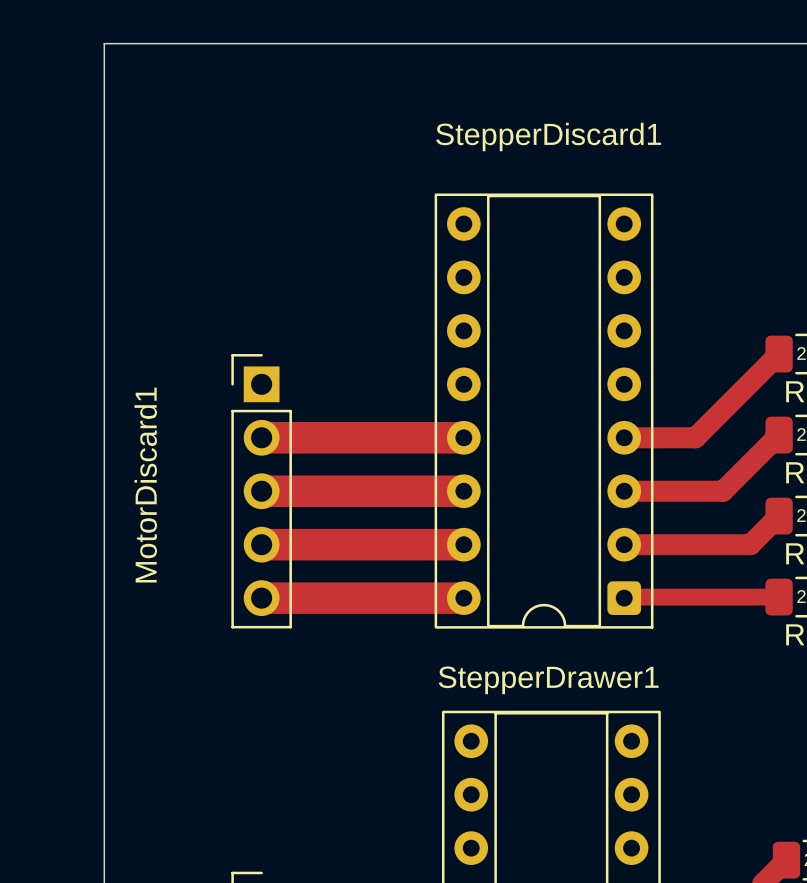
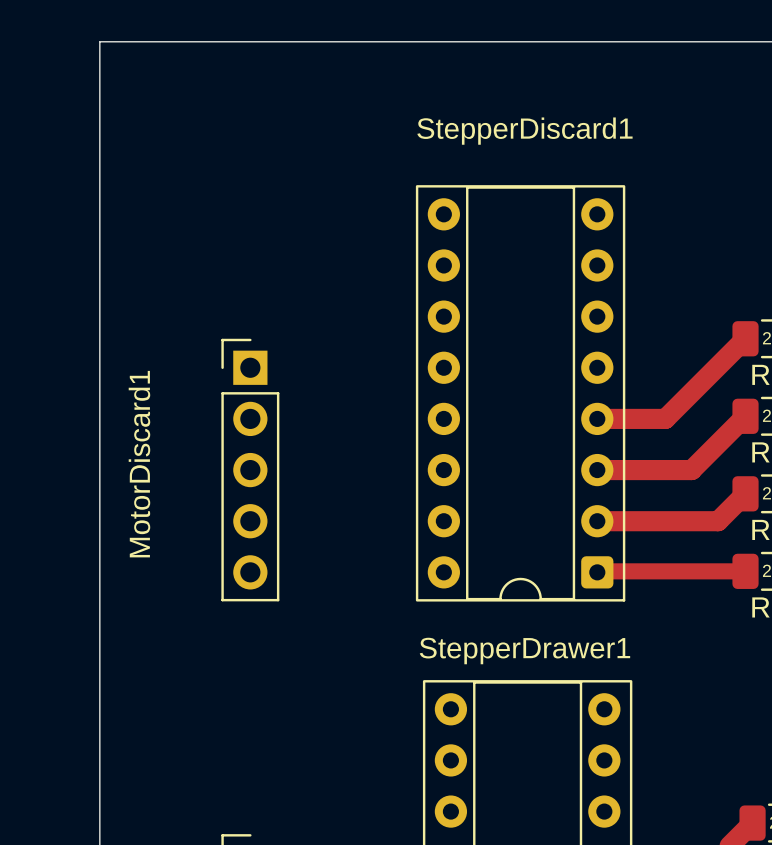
track: (261, 437) (463, 437) -> none
track: (261, 491) (463, 491) -> none
track: (261, 544) (463, 544) -> none
track: (261, 598) (463, 598) -> none

